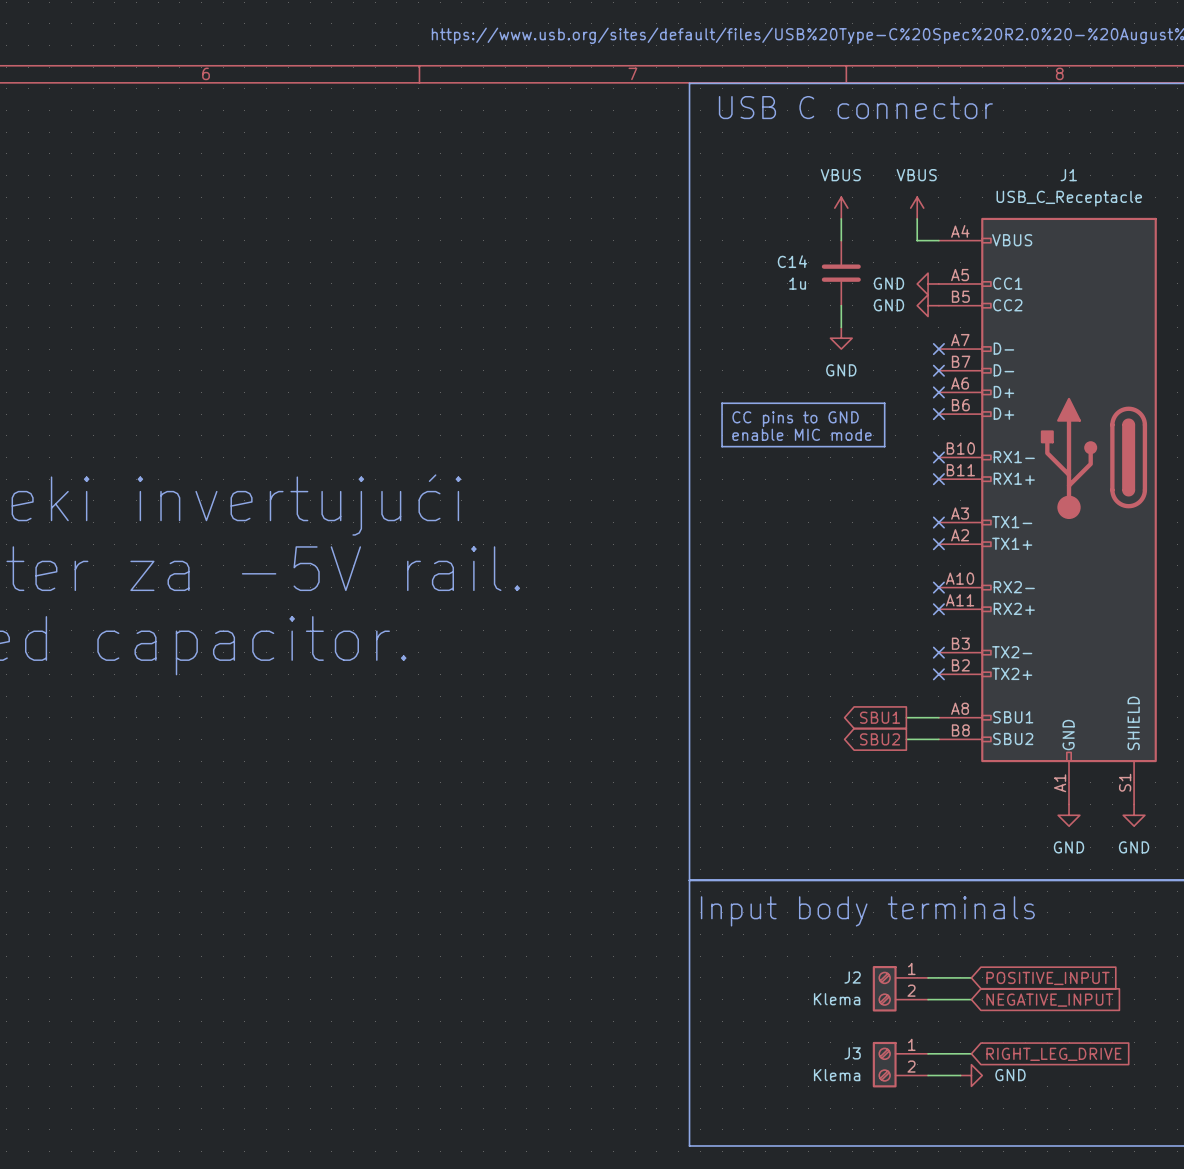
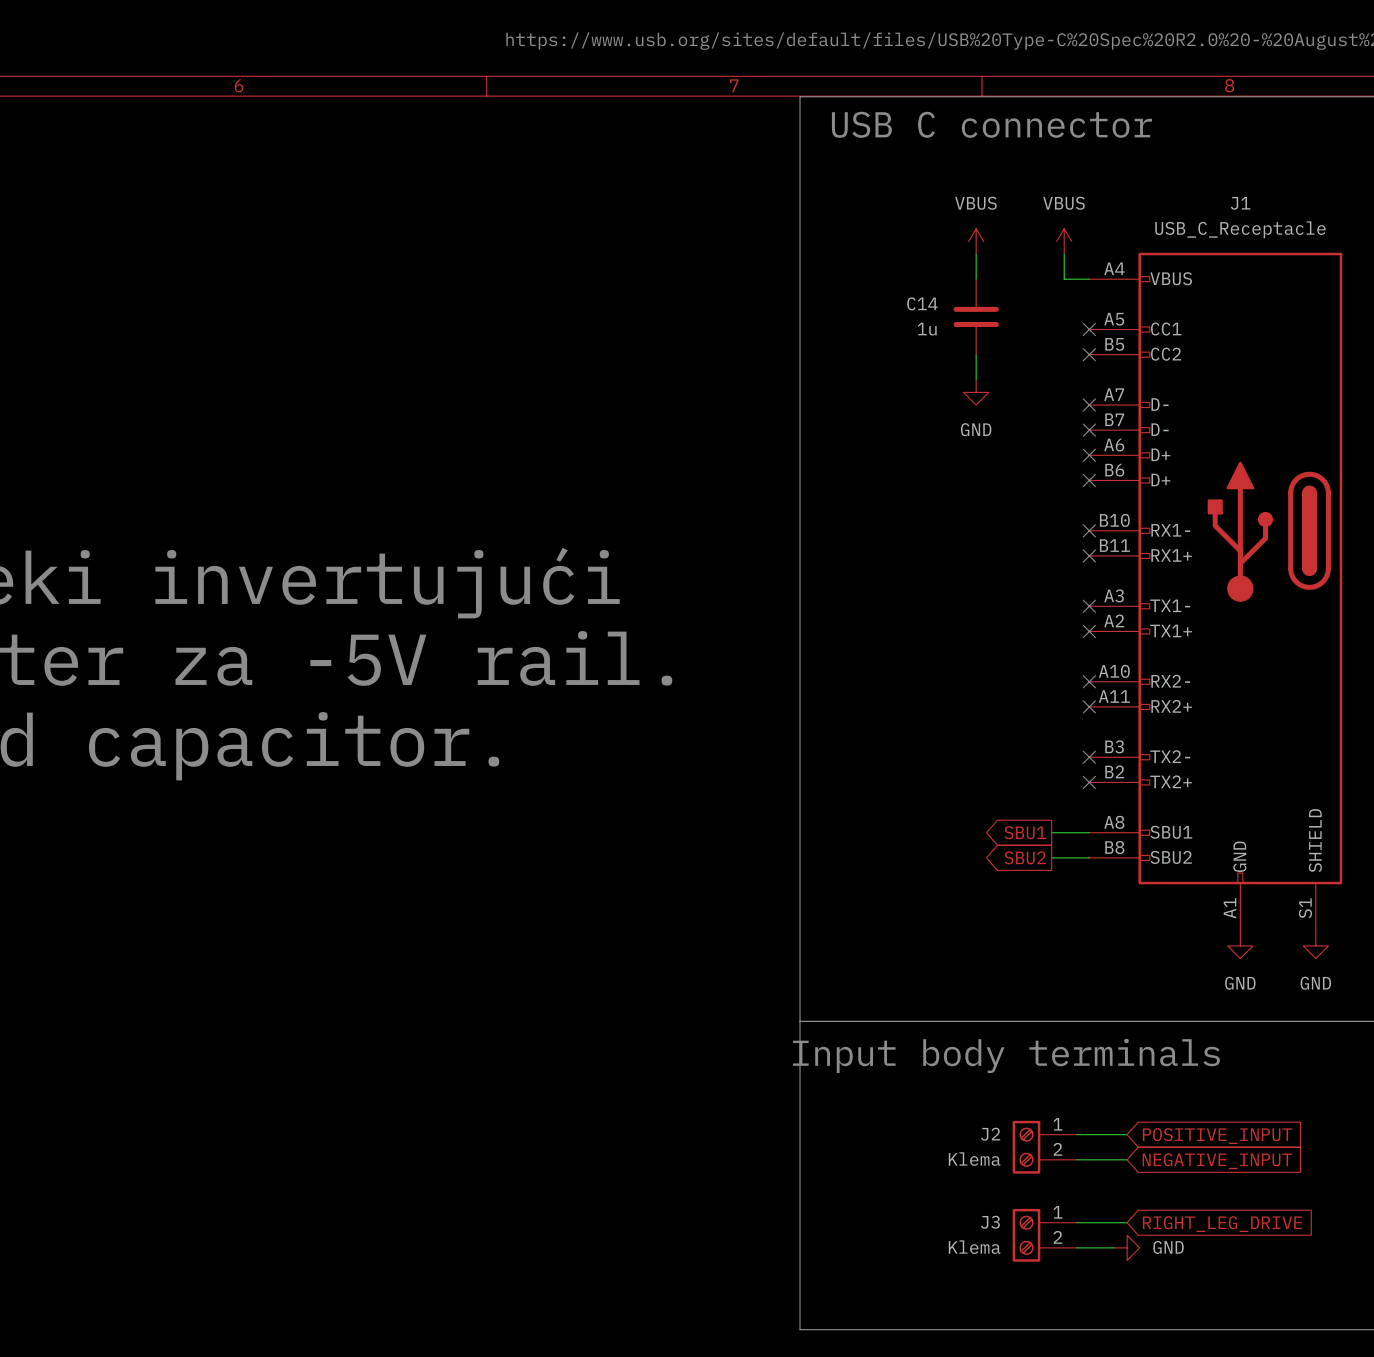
power symbol: GND (928, 283) -> none
no-connect mark: none -> (1089, 329)
power symbol: GND (928, 305) -> none
no-connect mark: none -> (1089, 354)
line: (722, 403) (884, 403) (884, 446) (722, 446) (722, 403) -> none
text: CC pins to GND (795, 419) -> none
text: enable MIC mode (802, 434) -> none

